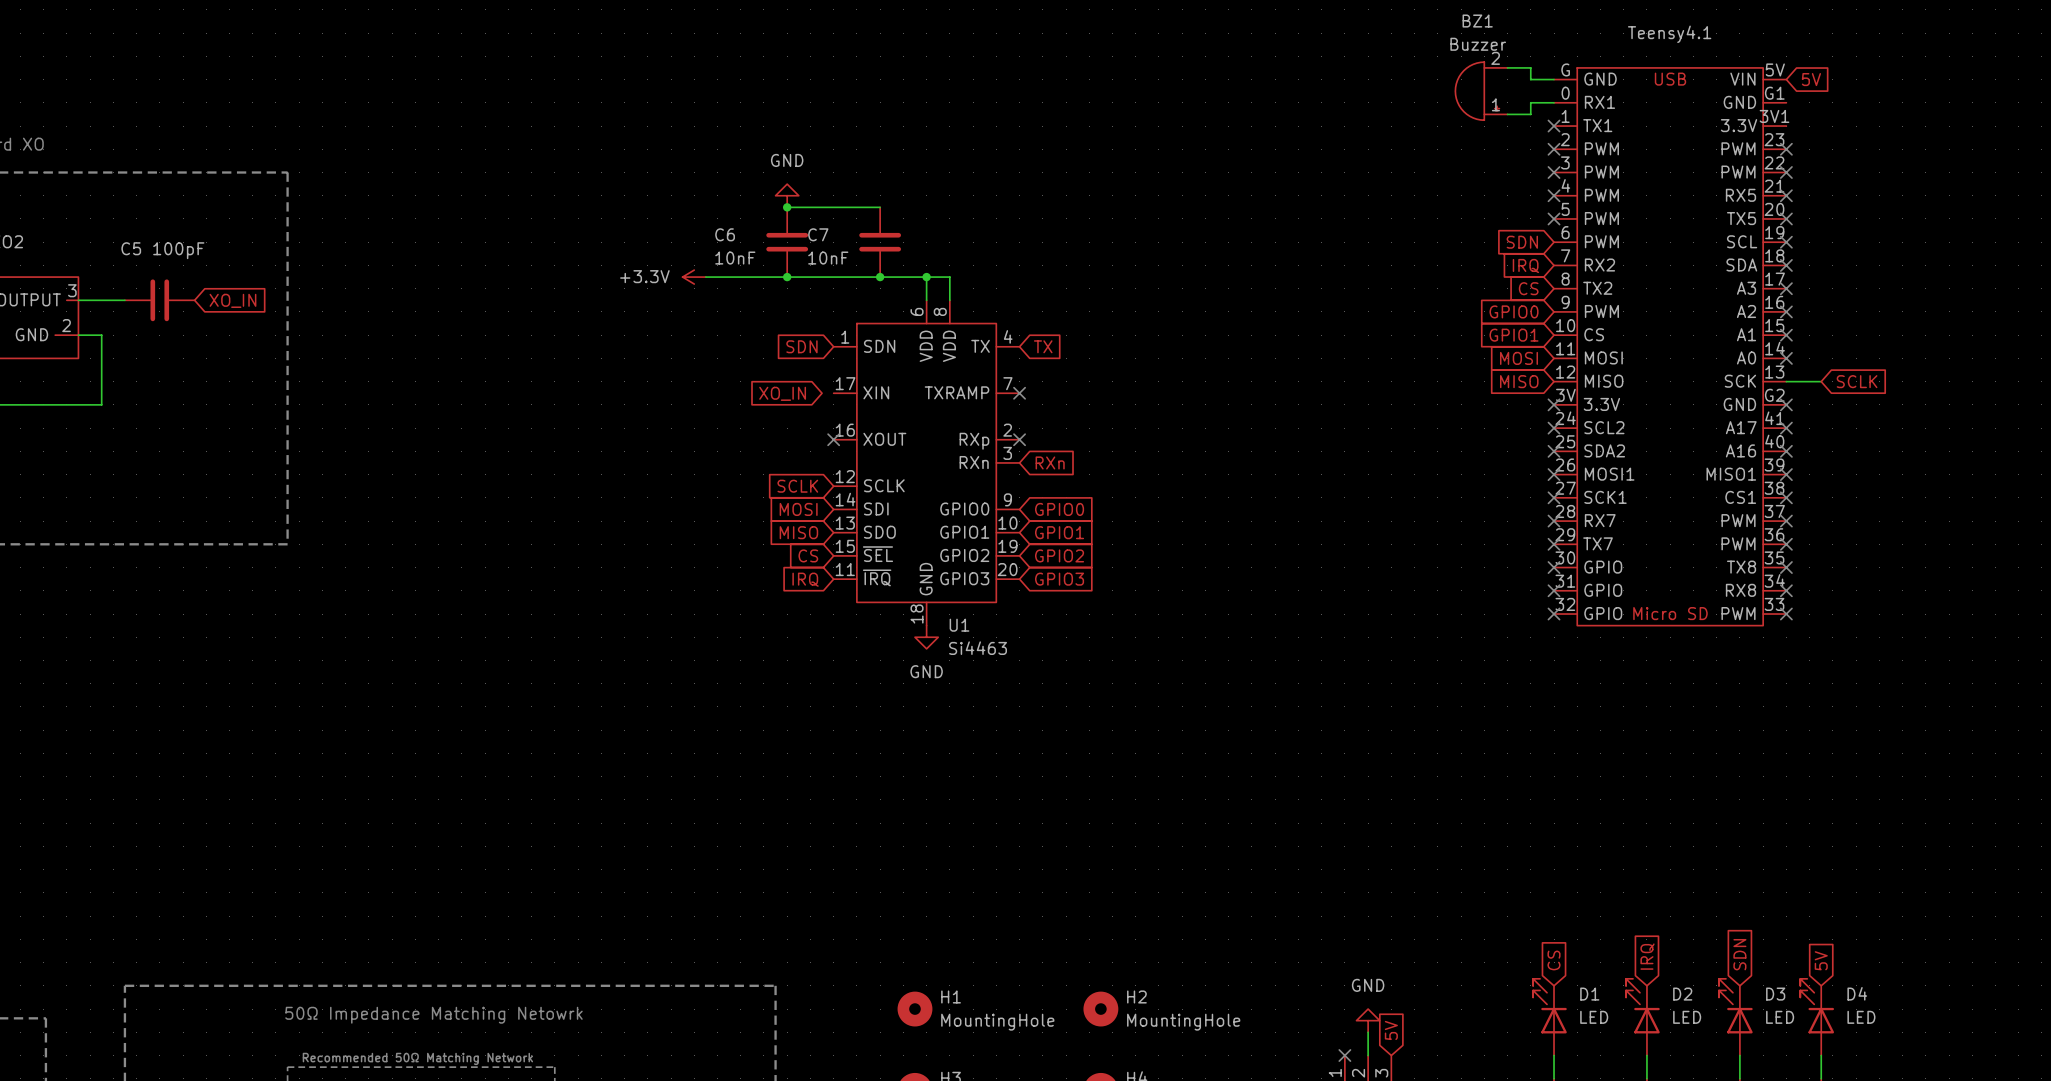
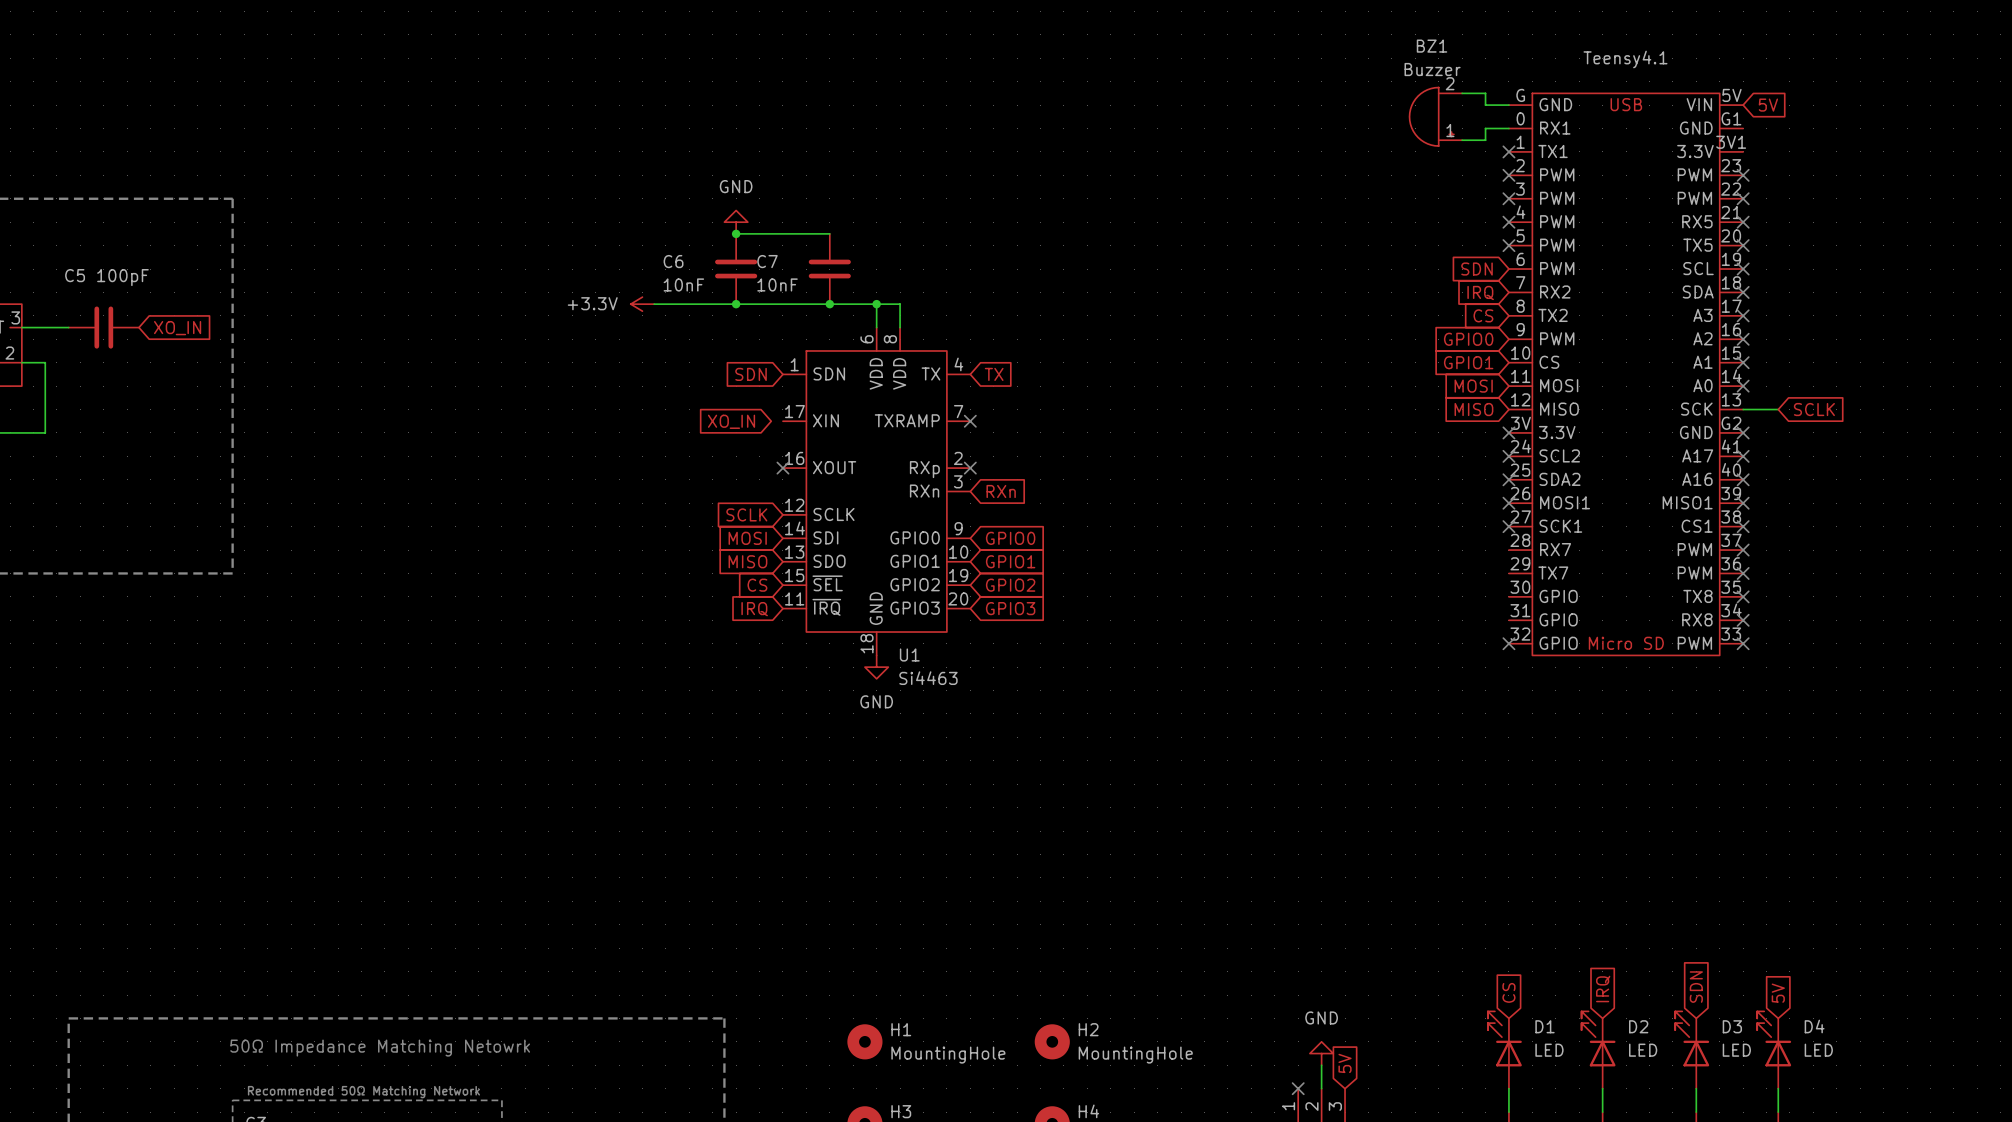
no-connect mark: (1554, 521) -> none
no-connect mark: (1554, 544) -> none
no-connect mark: (1554, 567) -> none
no-connect mark: (1554, 590) -> none

